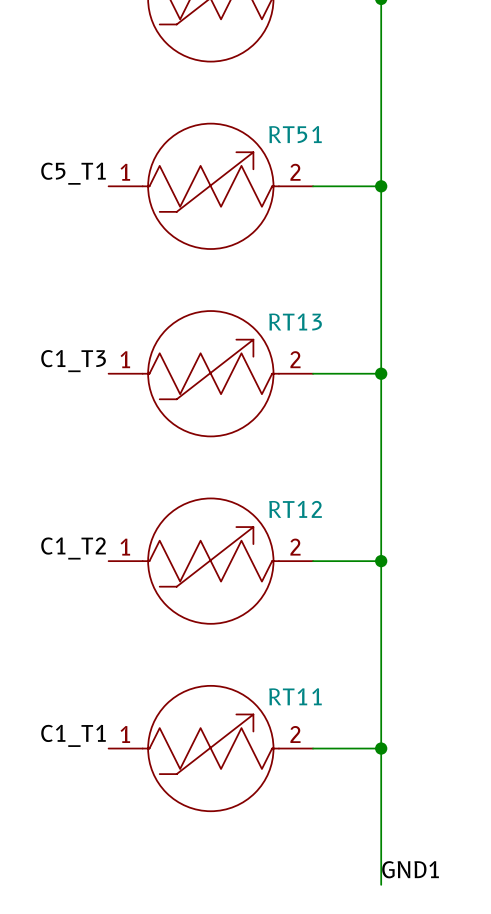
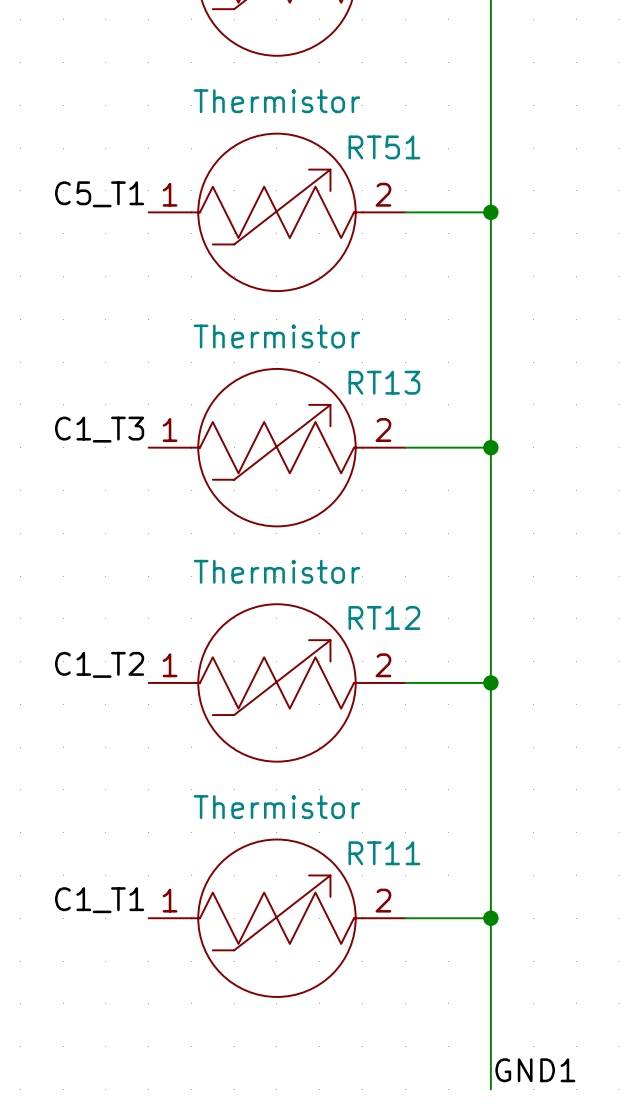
RT51 value: none -> Thermistor (276, 101)
RT13 value: none -> Thermistor (276, 336)
RT12 value: none -> Thermistor (276, 571)
RT11 value: none -> Thermistor (276, 807)

